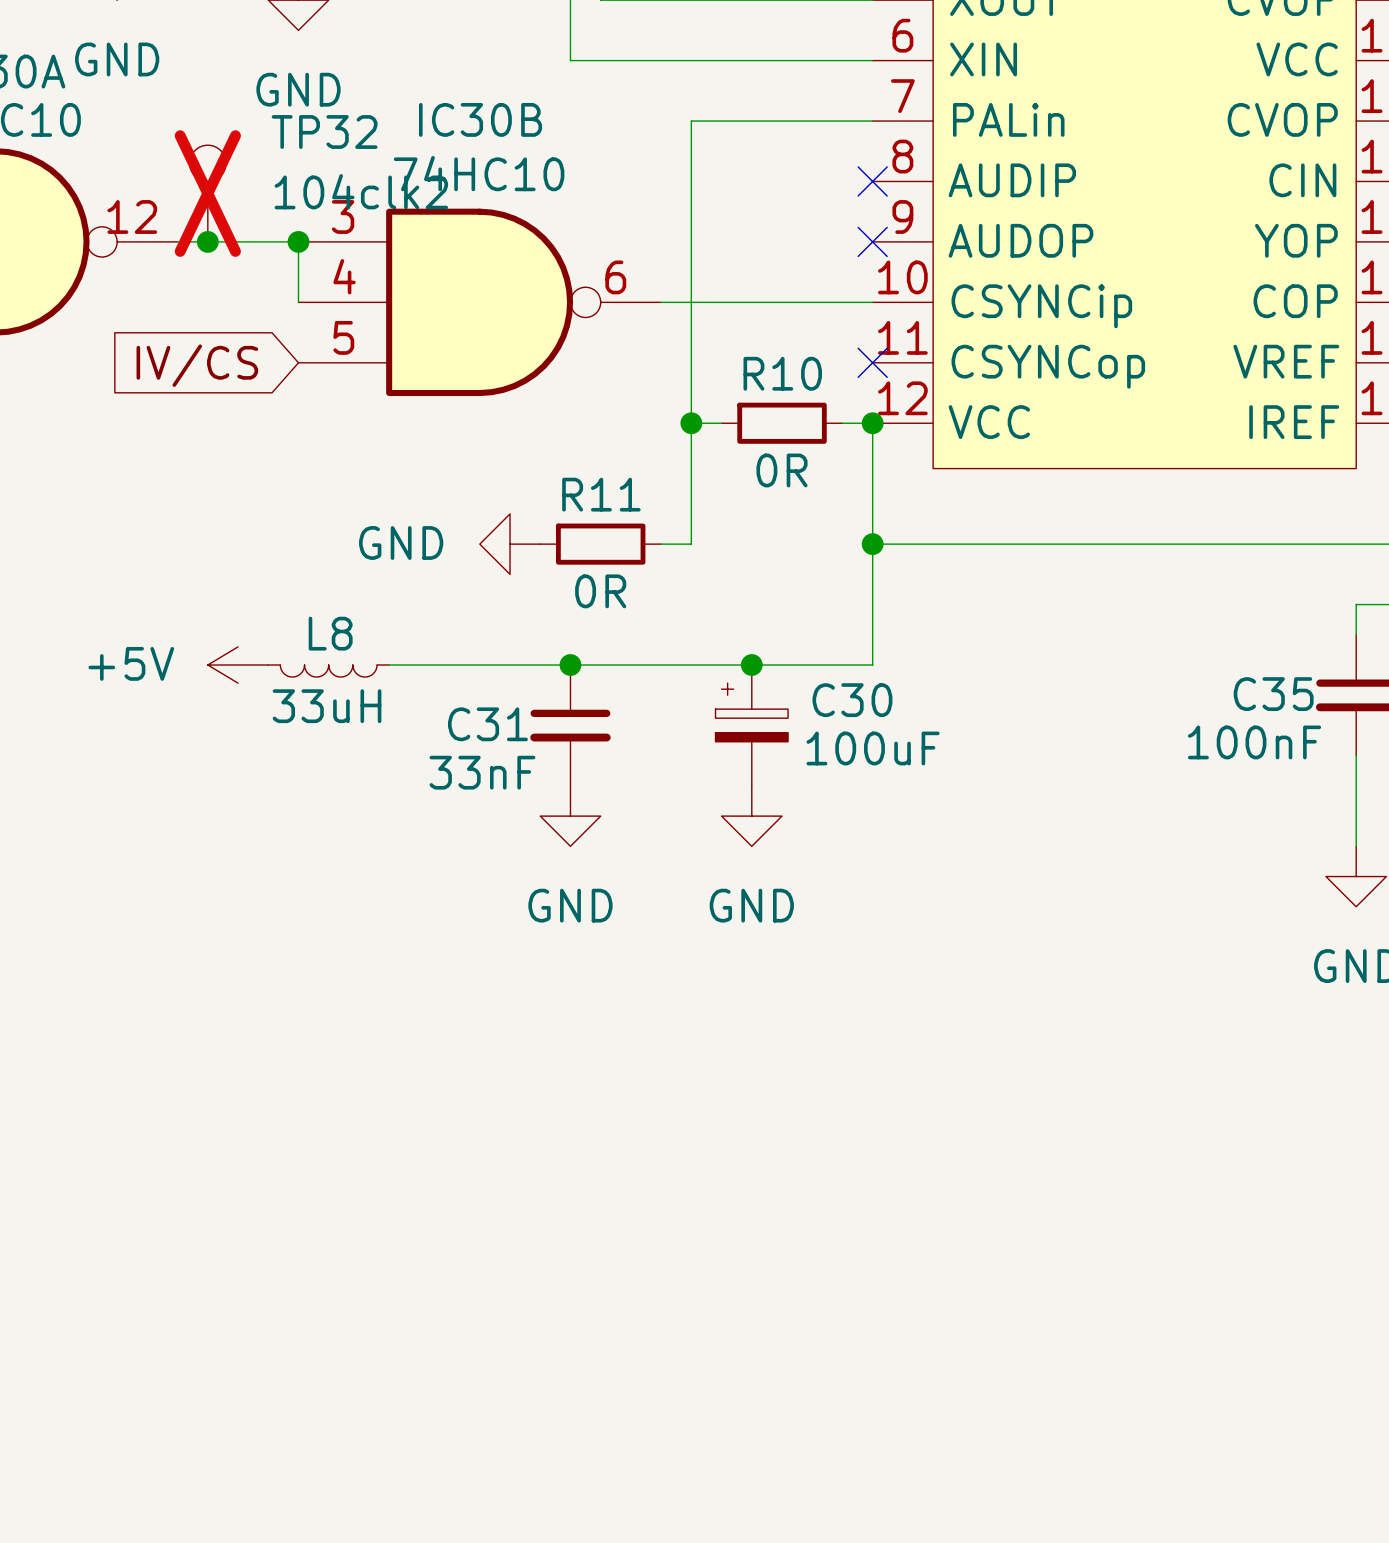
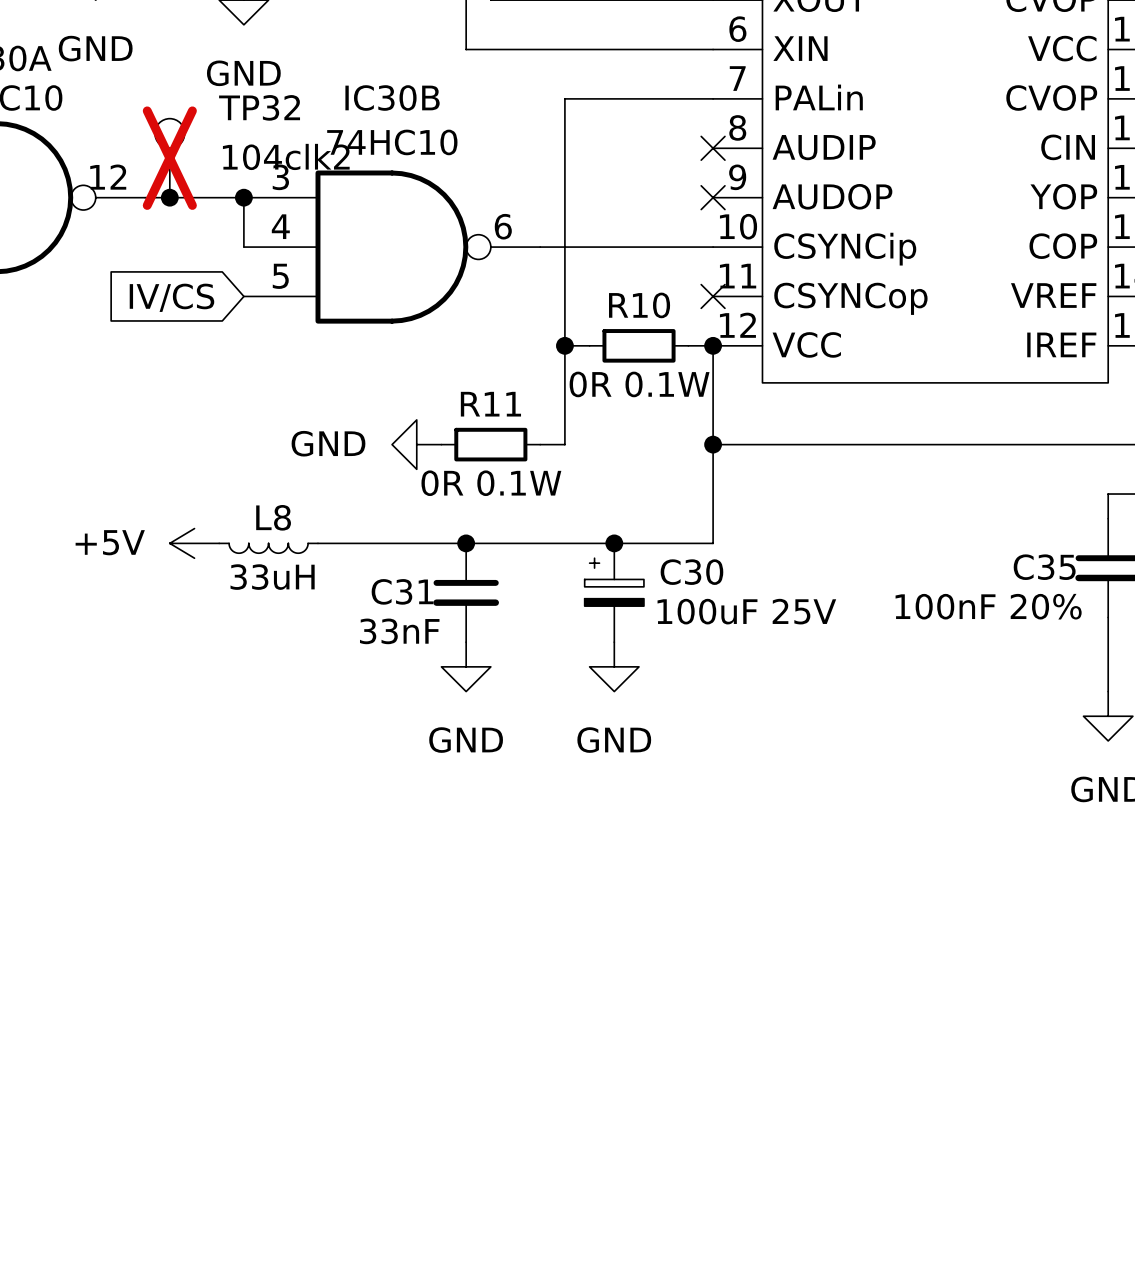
R10 value: 0R (782, 470) -> 0R 0.1W (639, 384)
R11 value: 0R (600, 591) -> 0R 0.1W (491, 483)
C35 value: 100nF (1254, 742) -> 100nF 20% (988, 606)
C30 value: 100uF (873, 748) -> 100uF 25V (746, 611)

